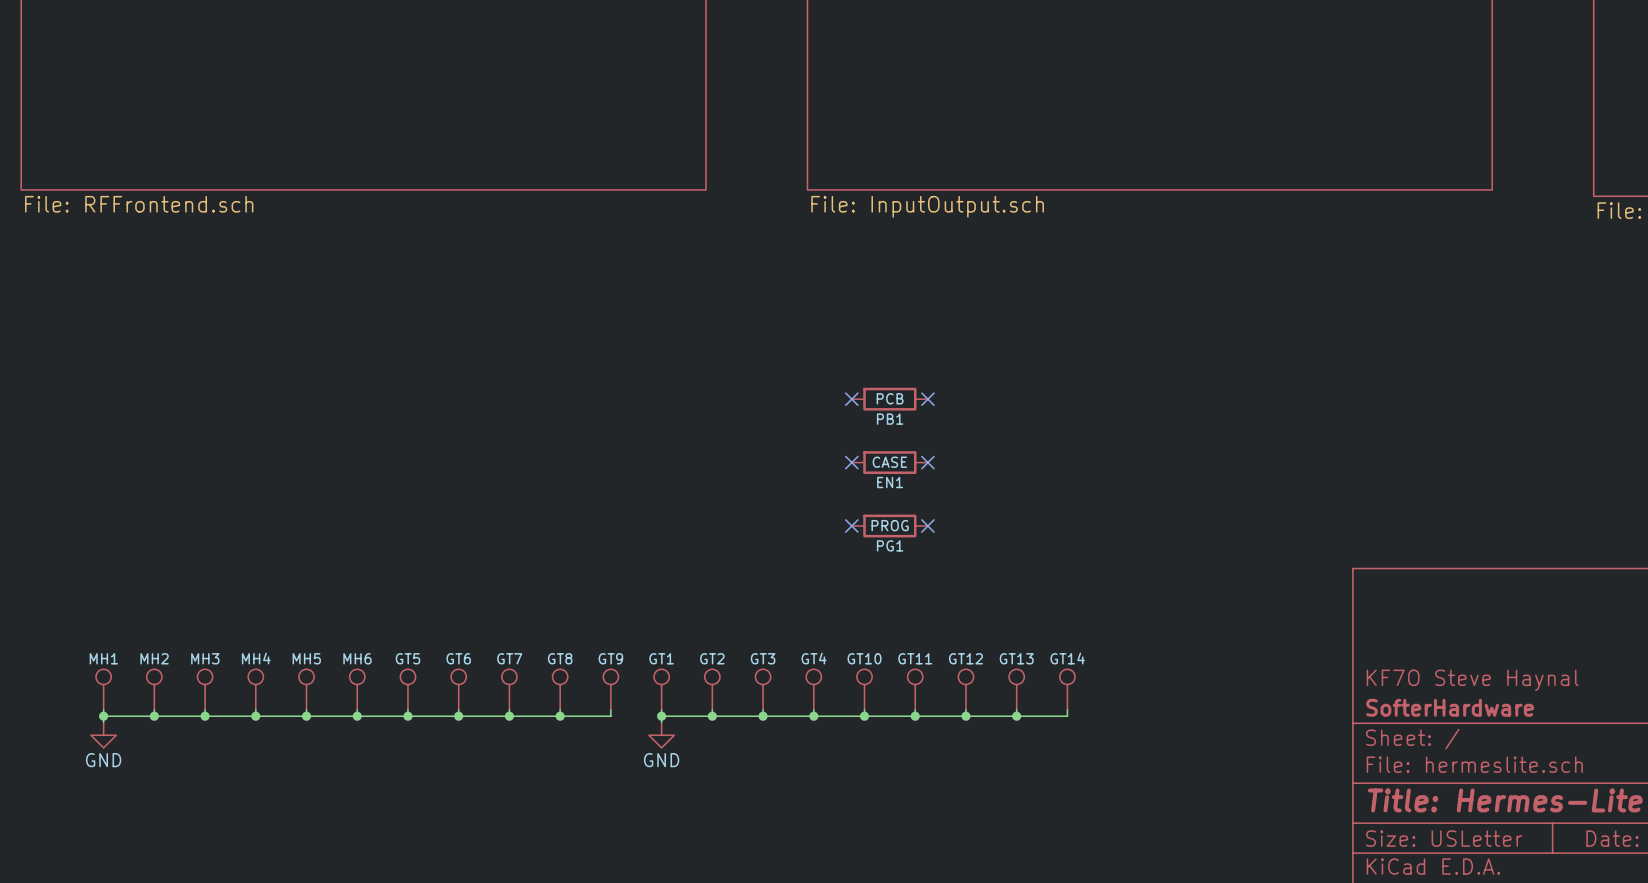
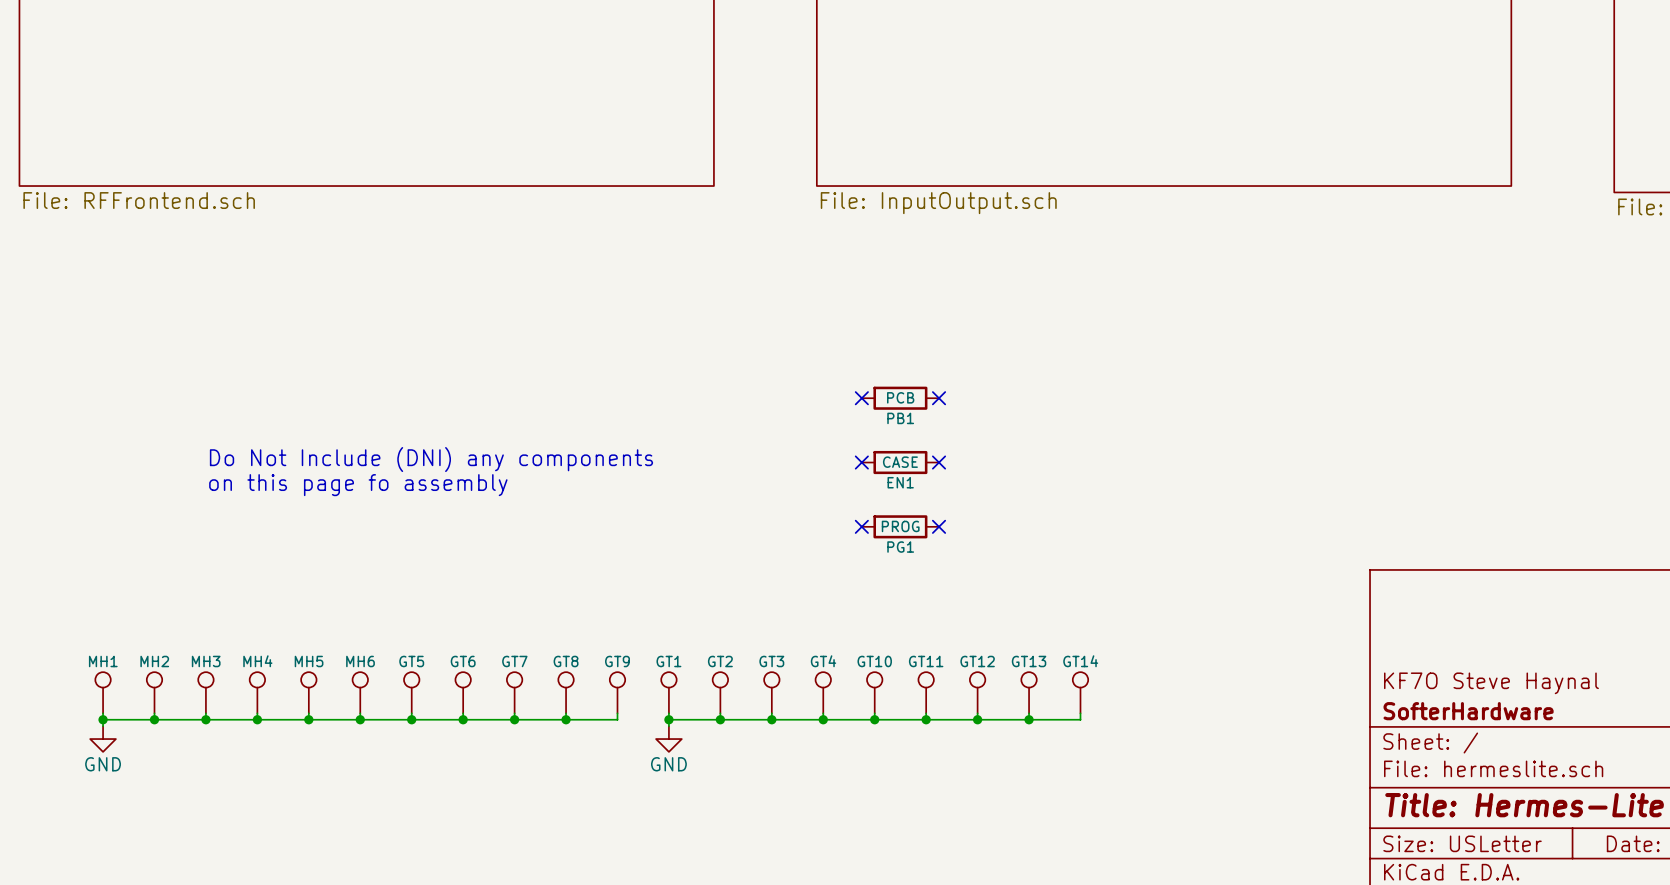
text: none -> Do Not Include (DNI) any components (431, 459)
text: none -> on this page fo assembly (358, 485)

